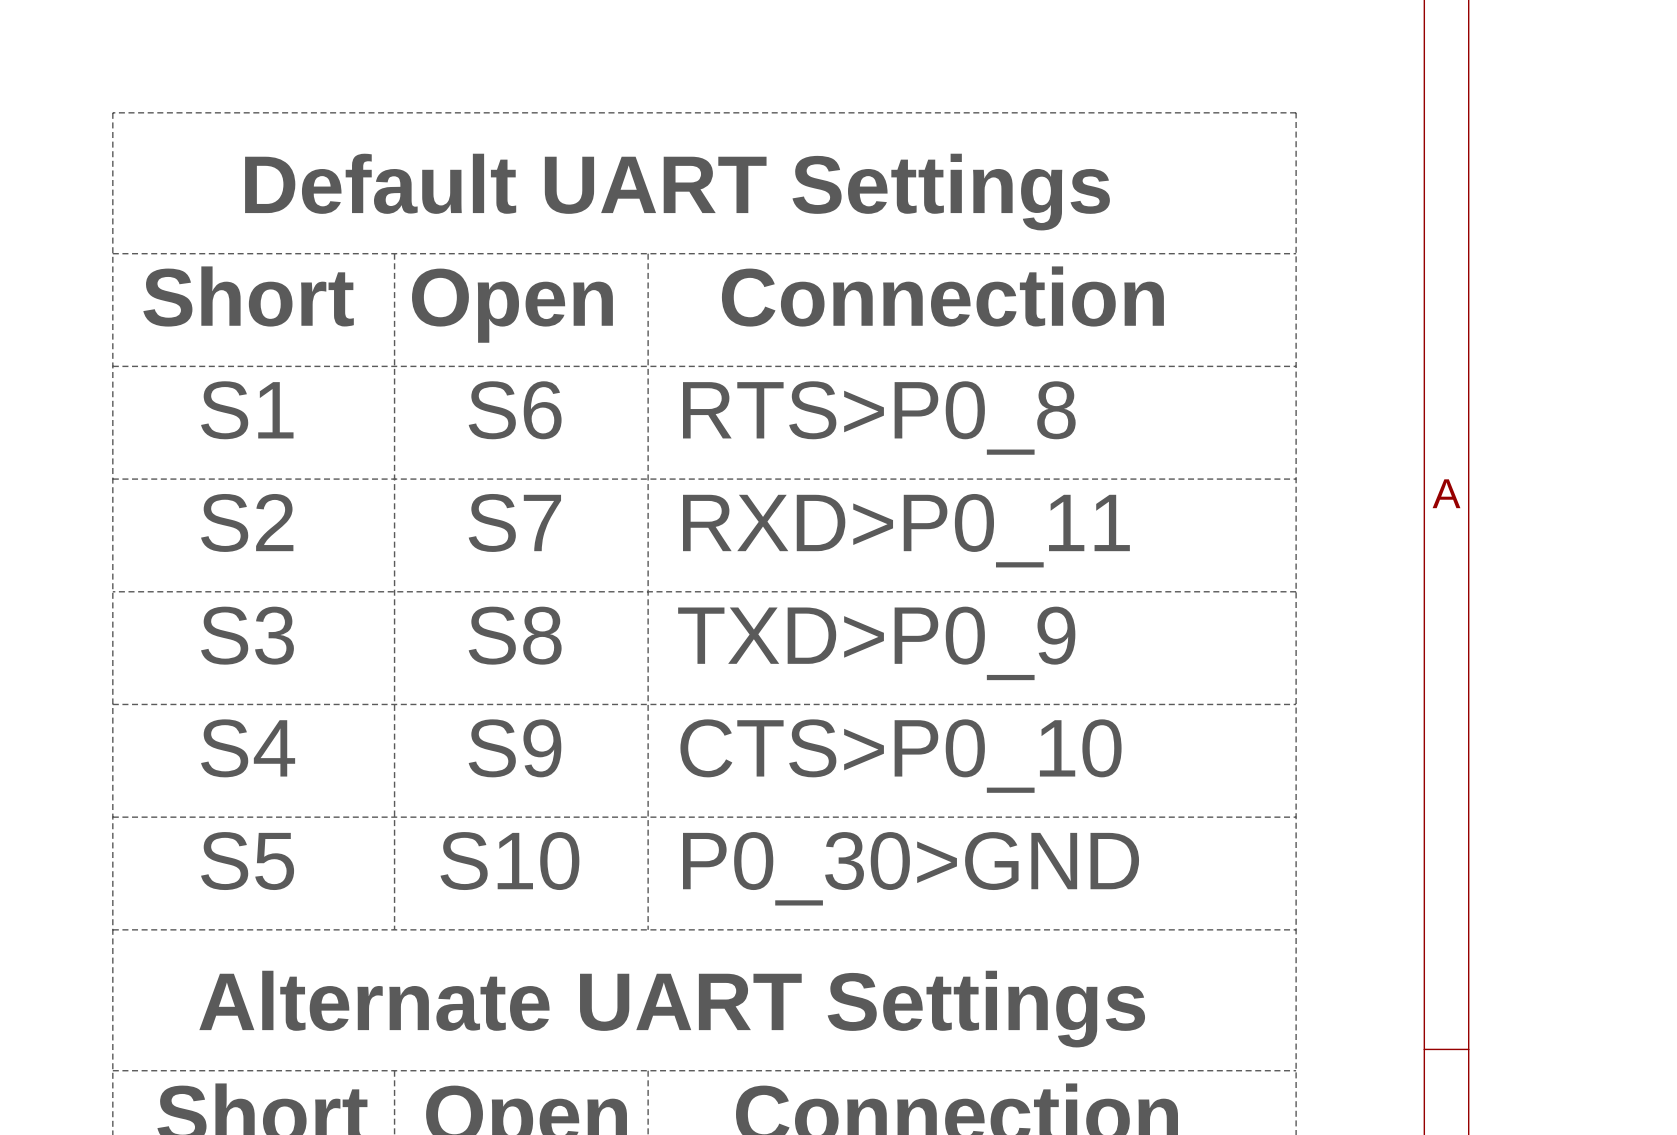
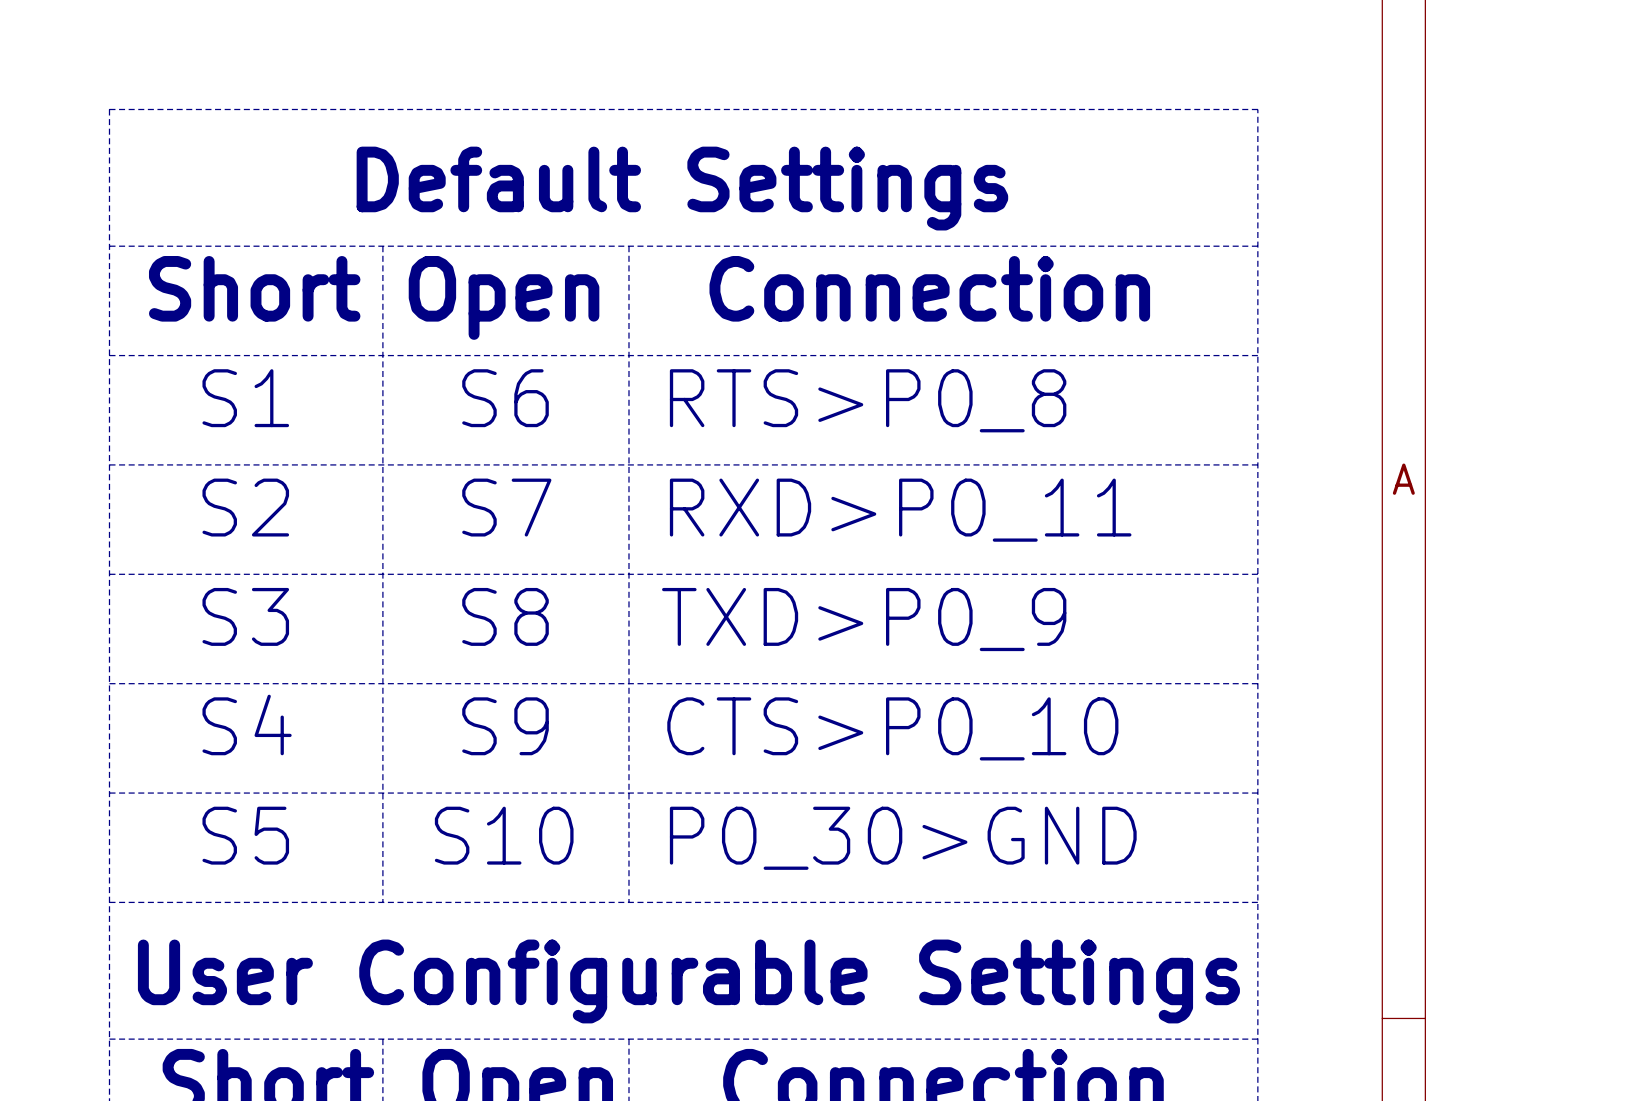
text: Default UART Settings (677, 192) -> Default Settings (682, 188)
text: none -> User Configurable Settings (688, 981)
text: Alternate UART Settings (672, 1009) -> none

